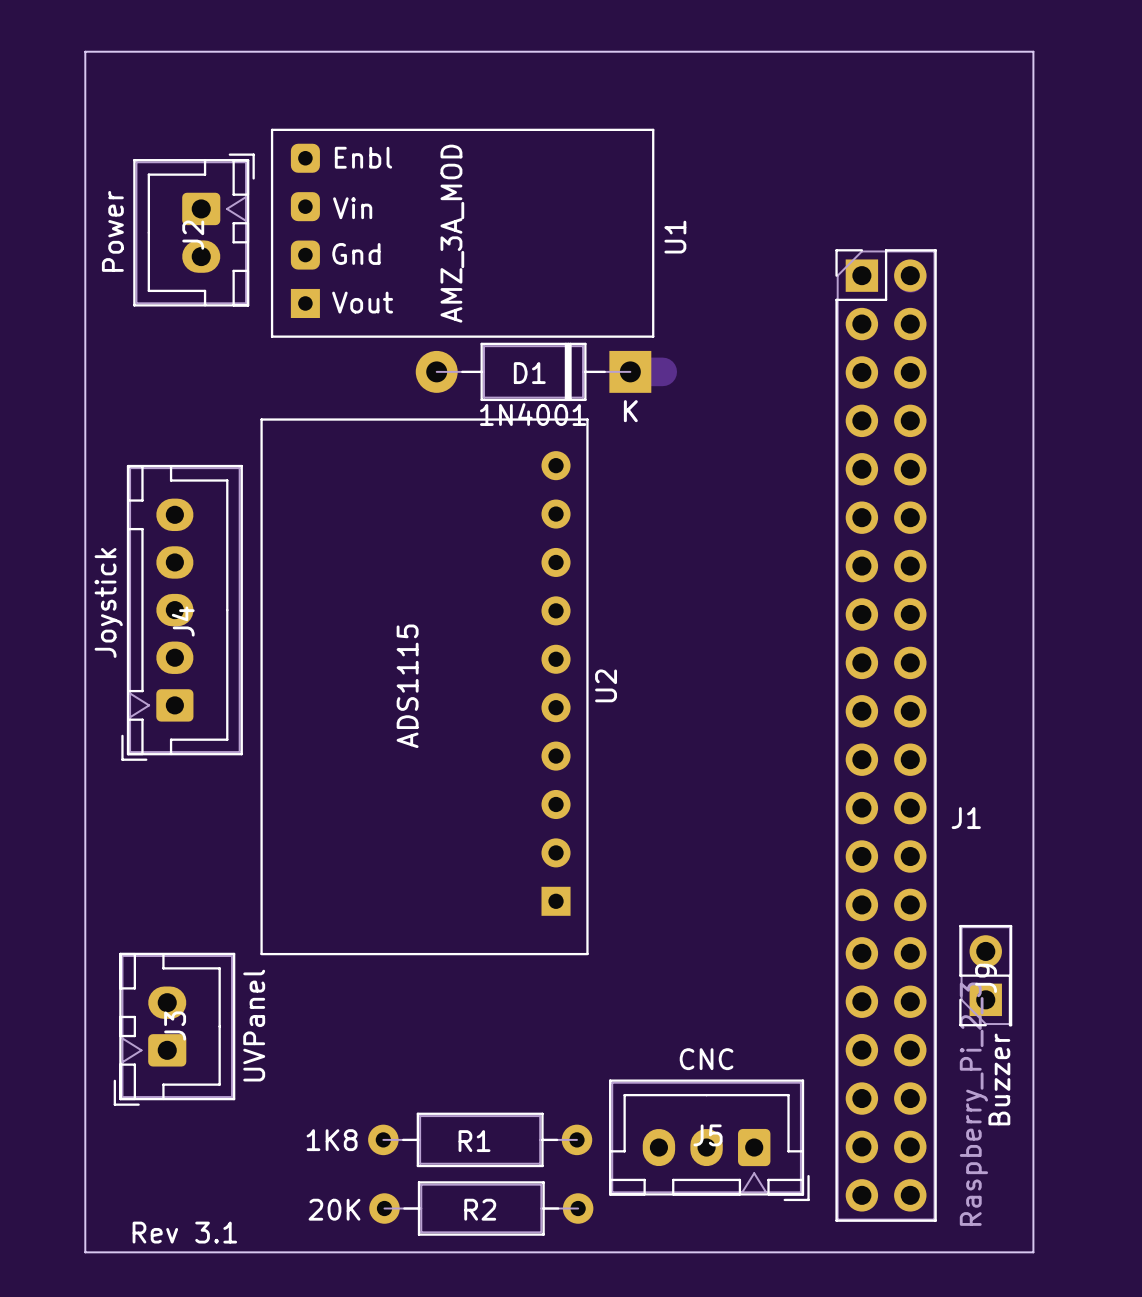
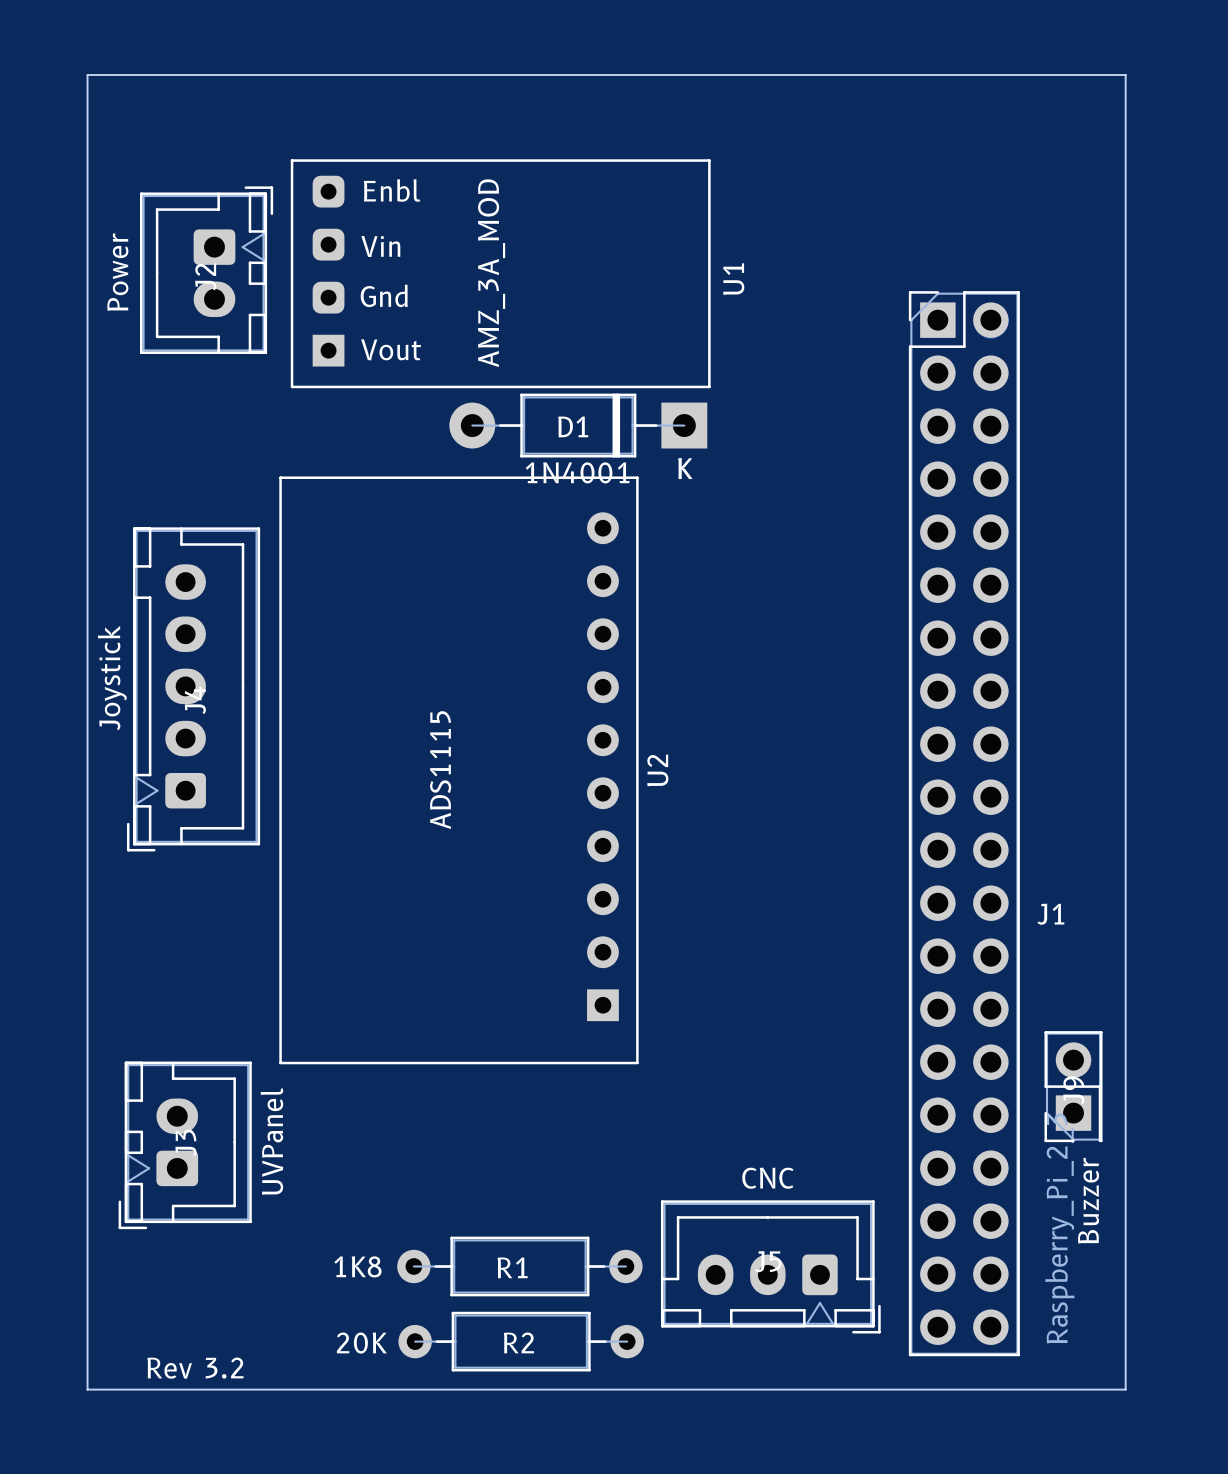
track: (630, 371) (662, 371) -> none
text: Rev 3.1 (184, 1232) -> Rev 3.2 (195, 1368)

